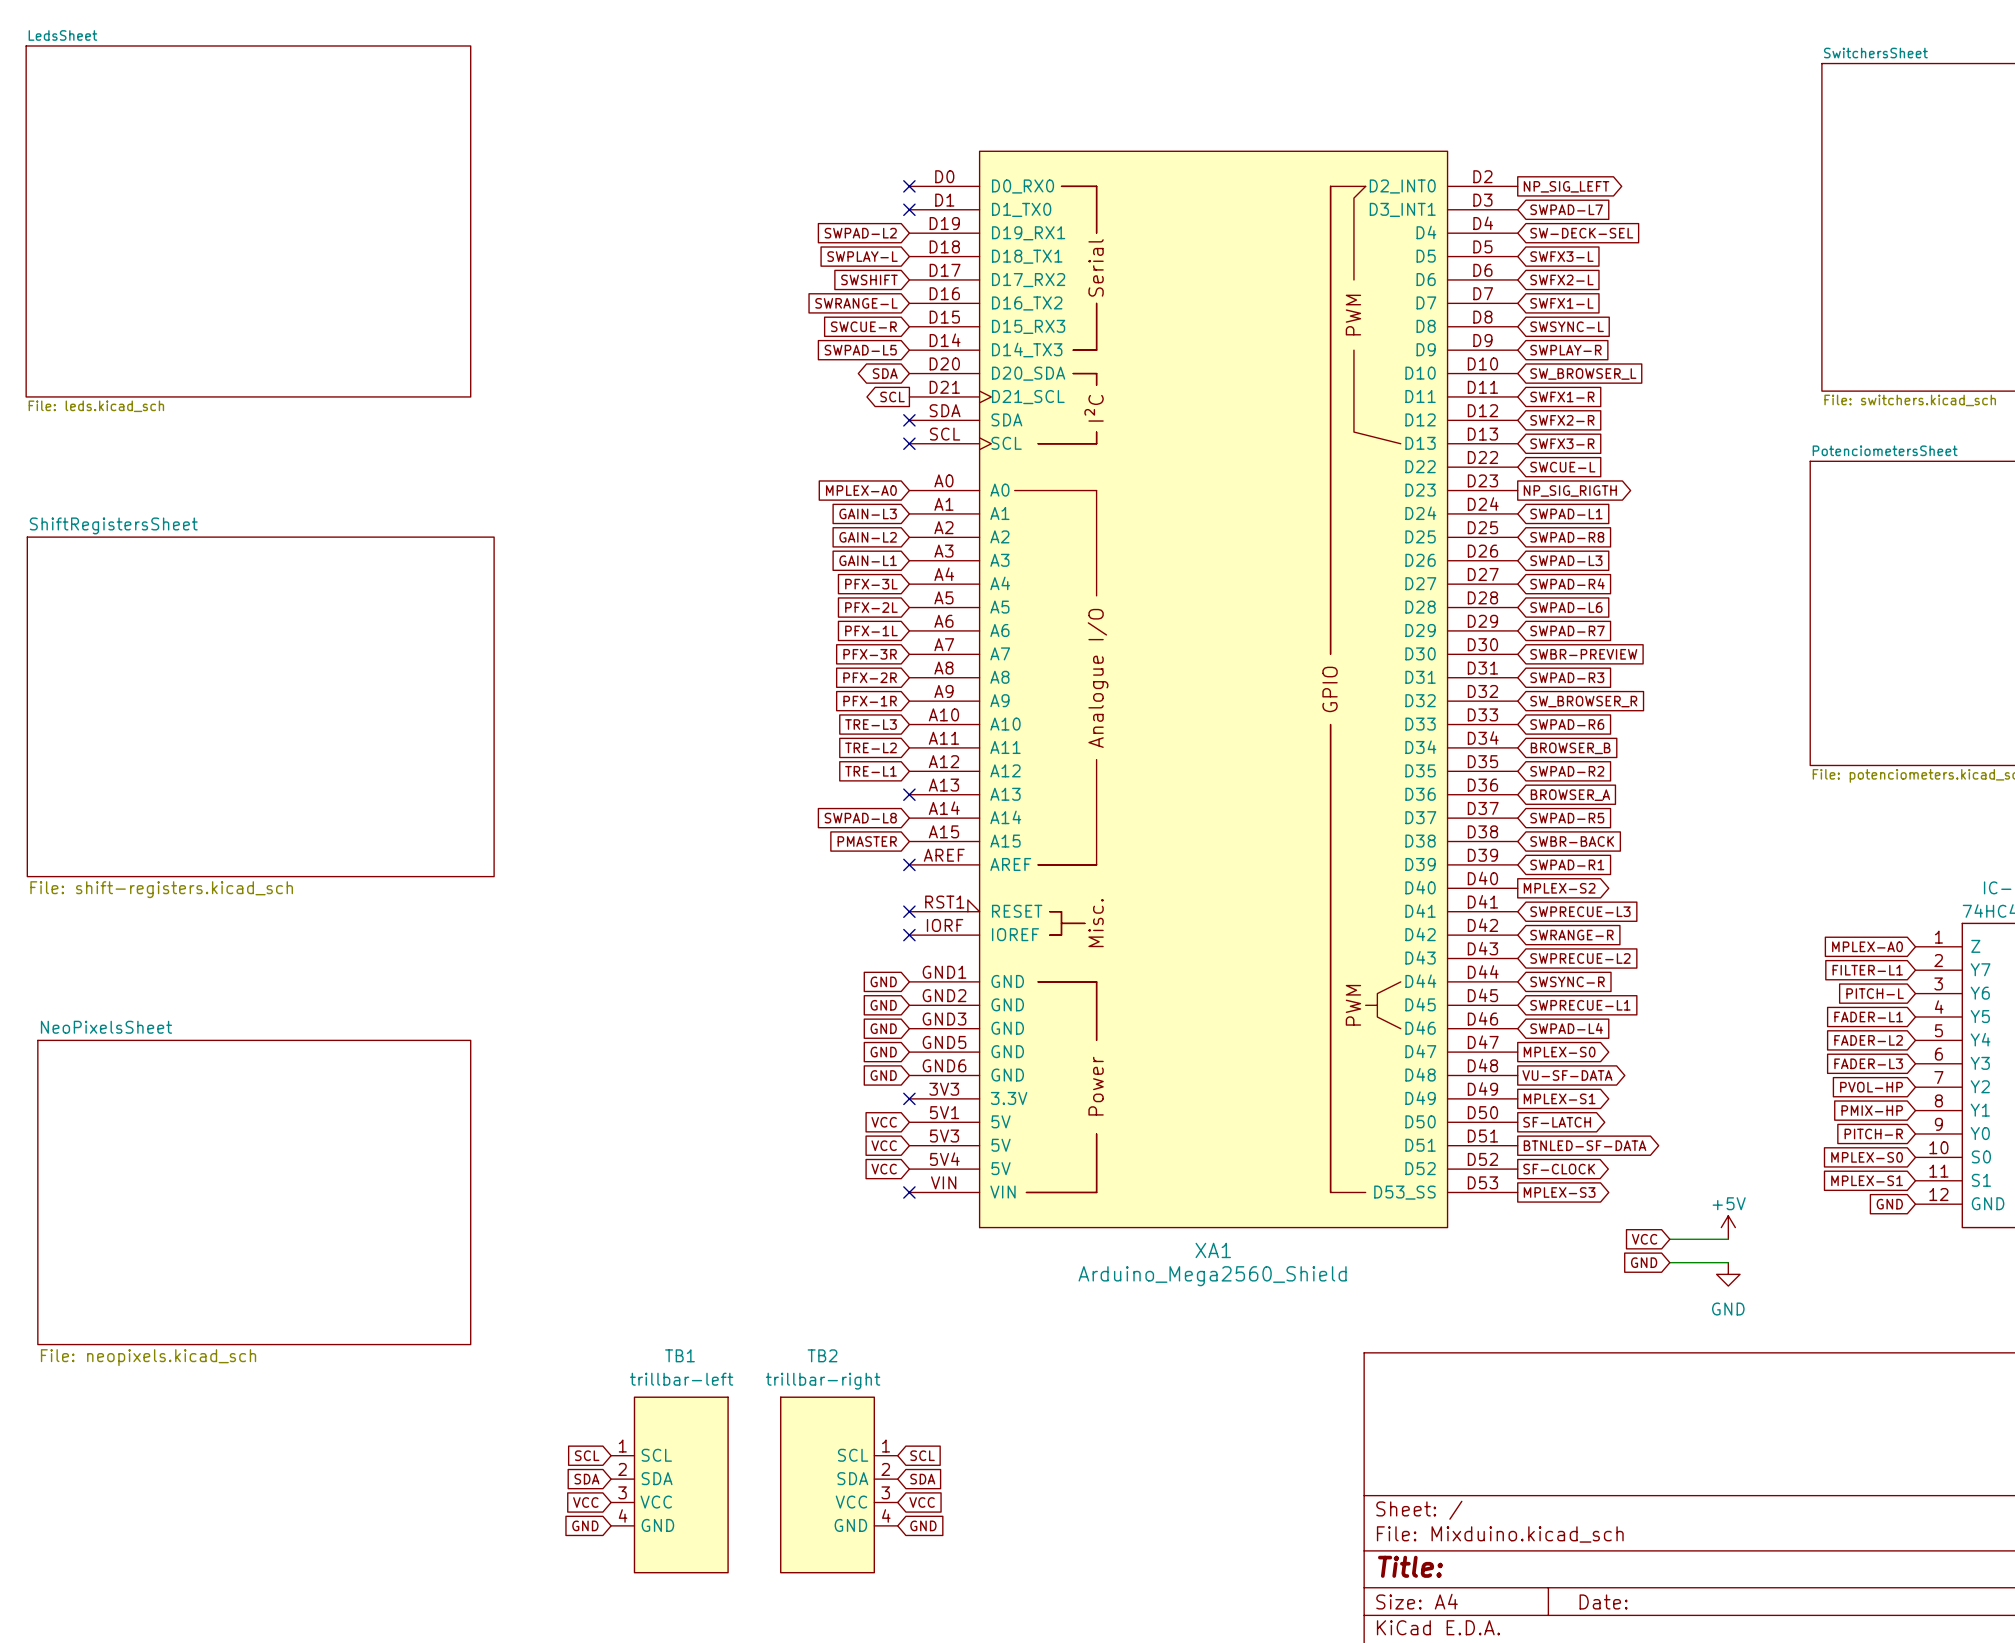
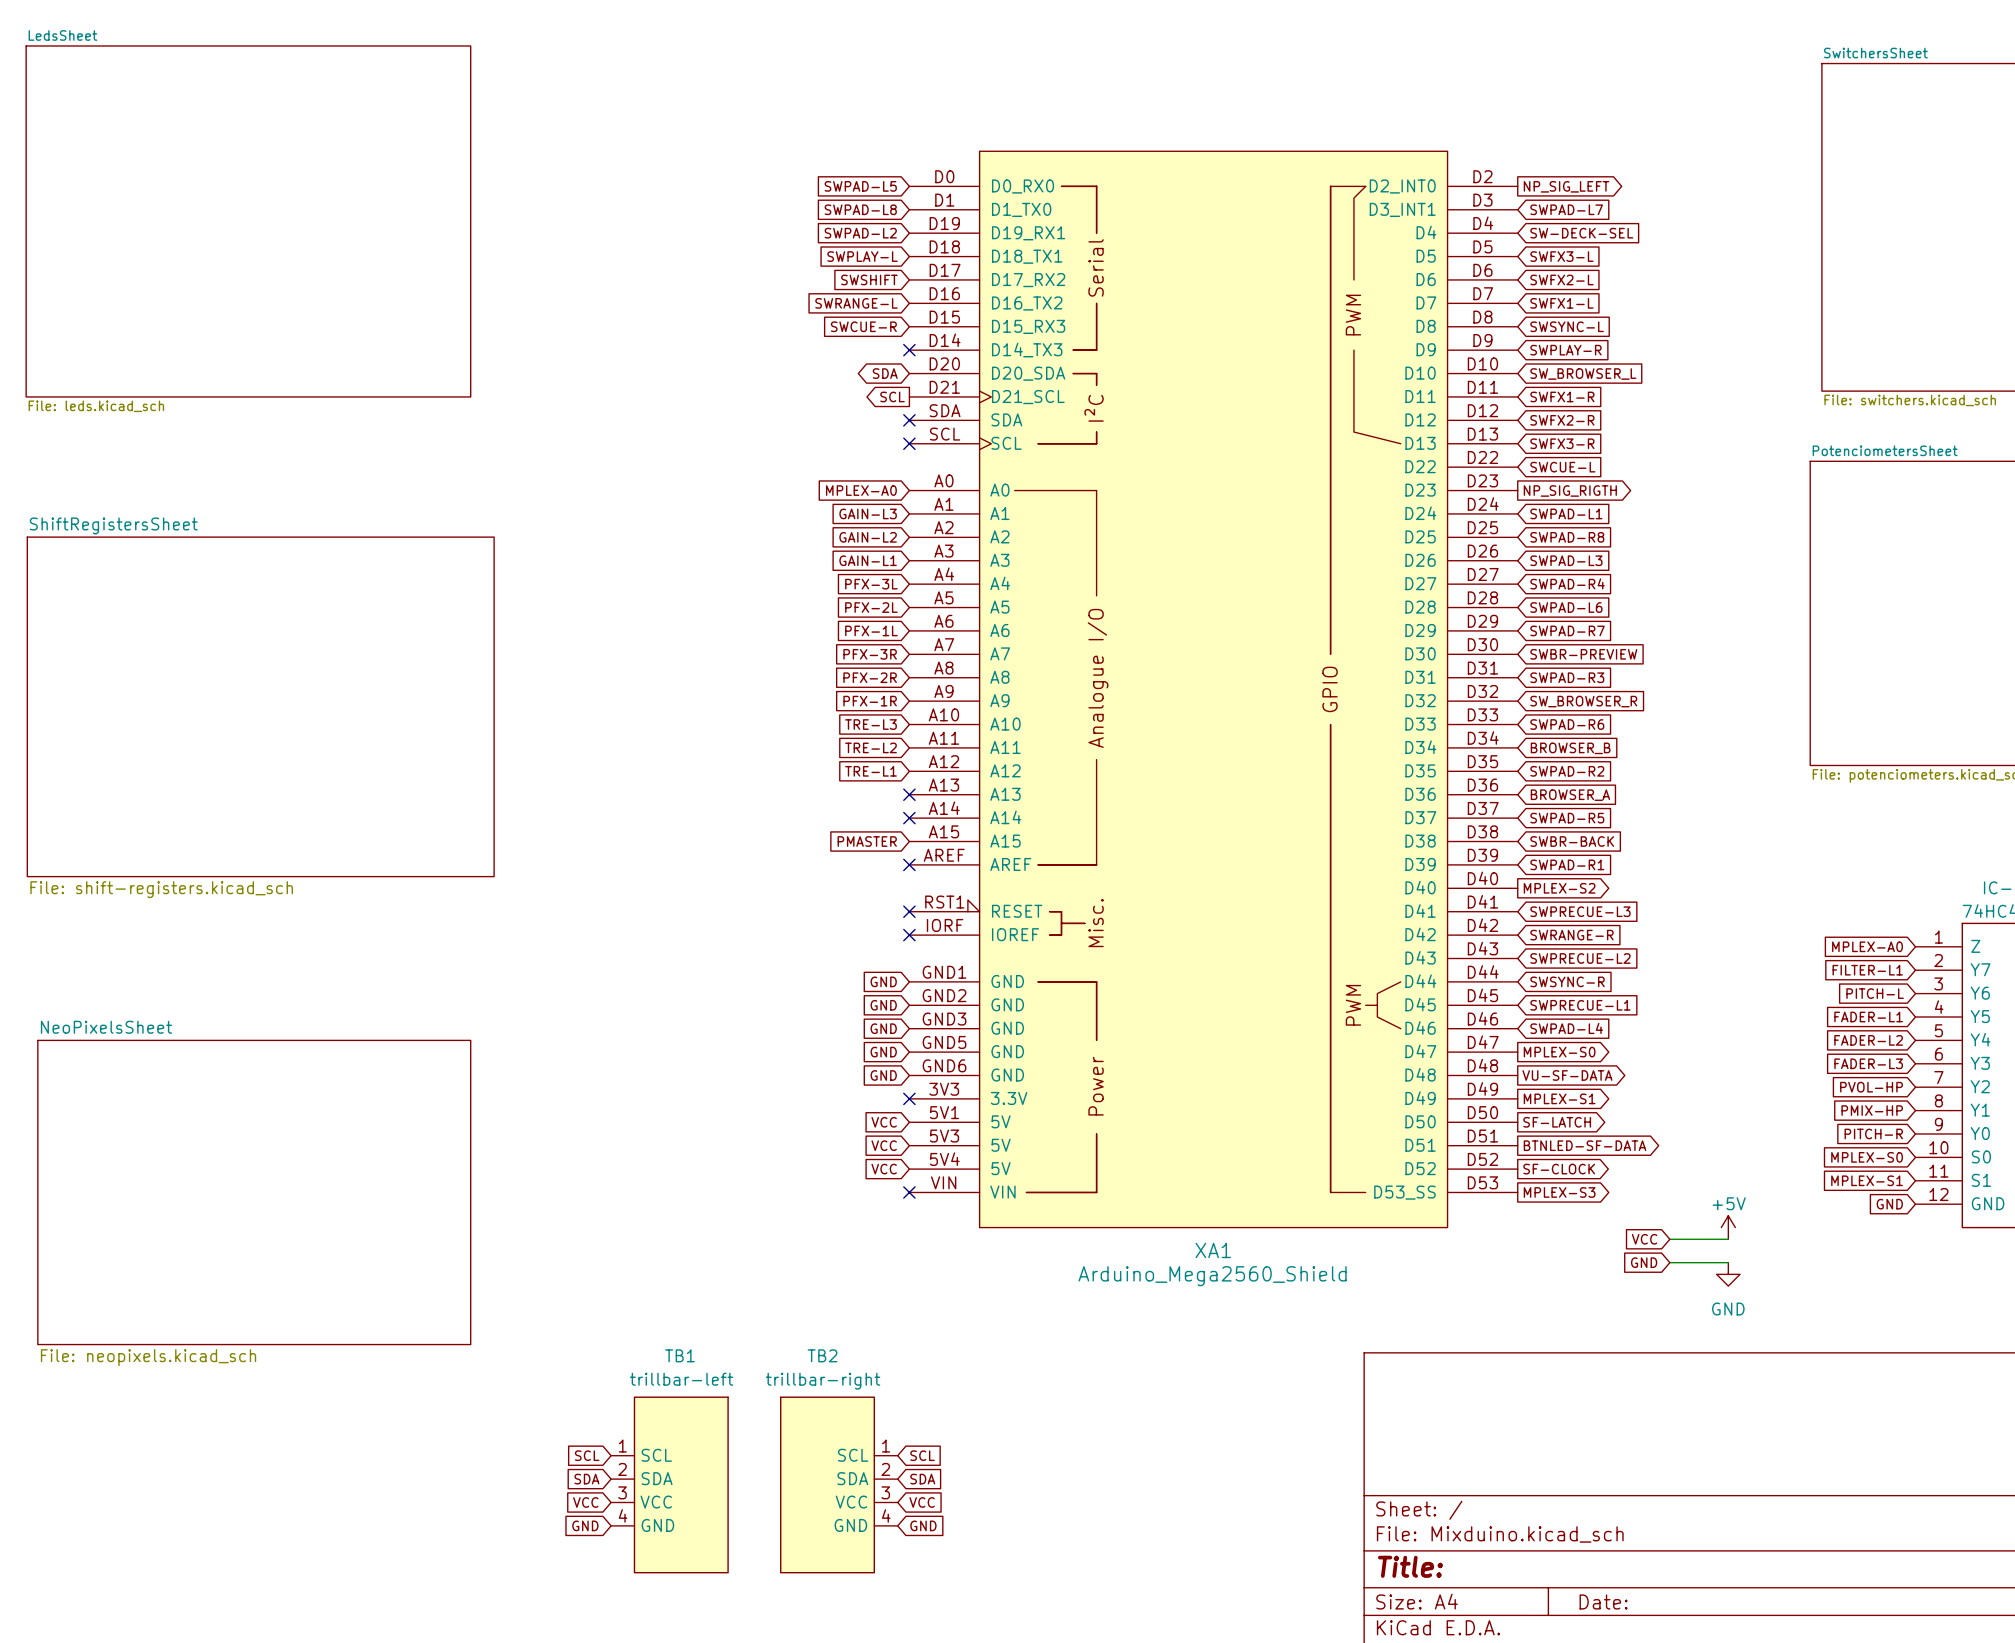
no-connect mark: (909, 186) -> none
global label: none -> SWPAD-L8 (860, 209)
no-connect mark: (909, 209) -> none
global label position: SWPAD-L5 (860, 350) -> SWPAD-L5 (860, 186)
no-connect mark: none -> (909, 350)
global label: SWPAD-L8 (860, 818) -> none
no-connect mark: none -> (909, 818)

